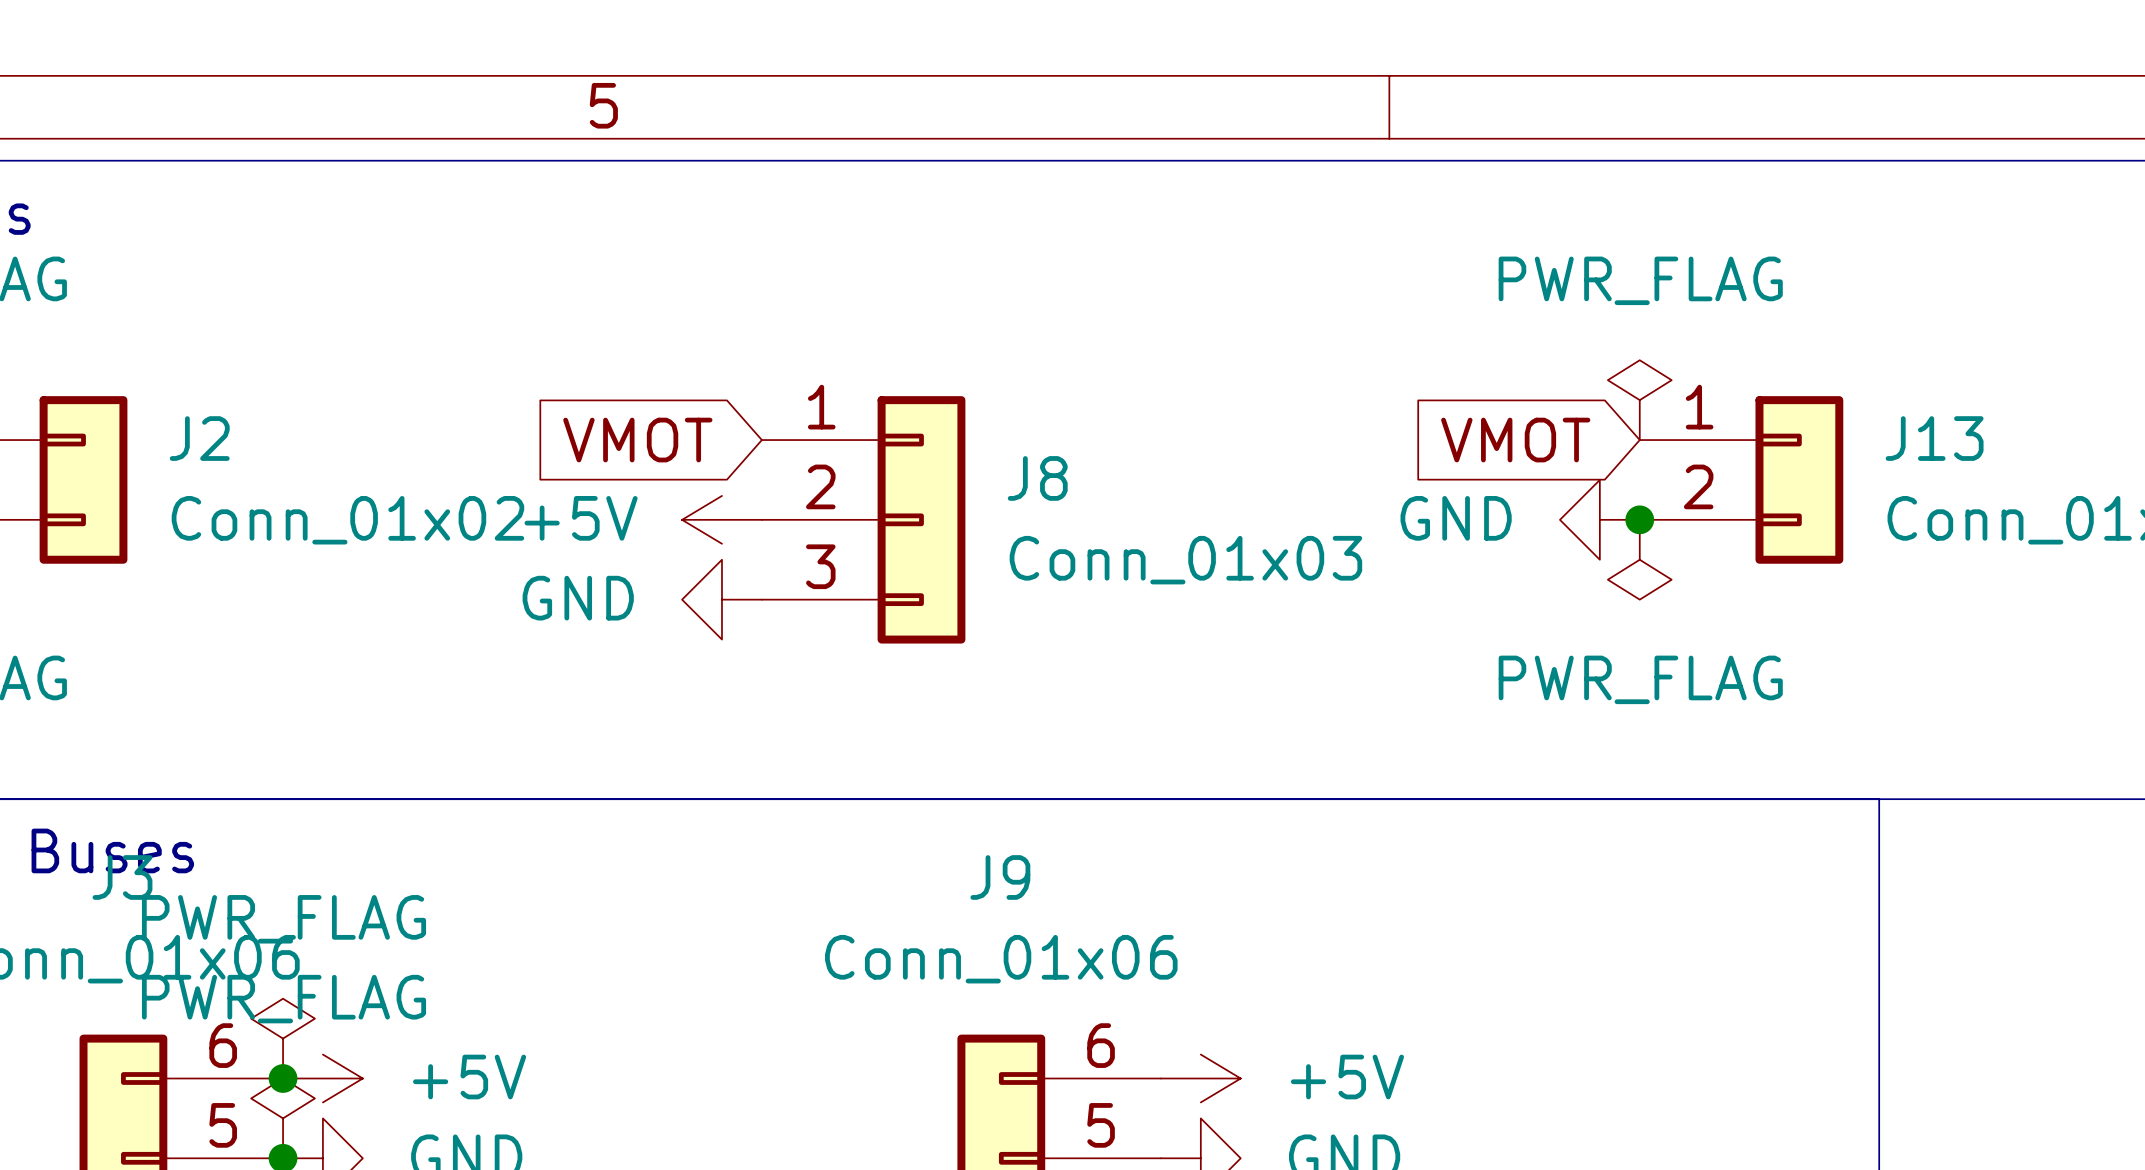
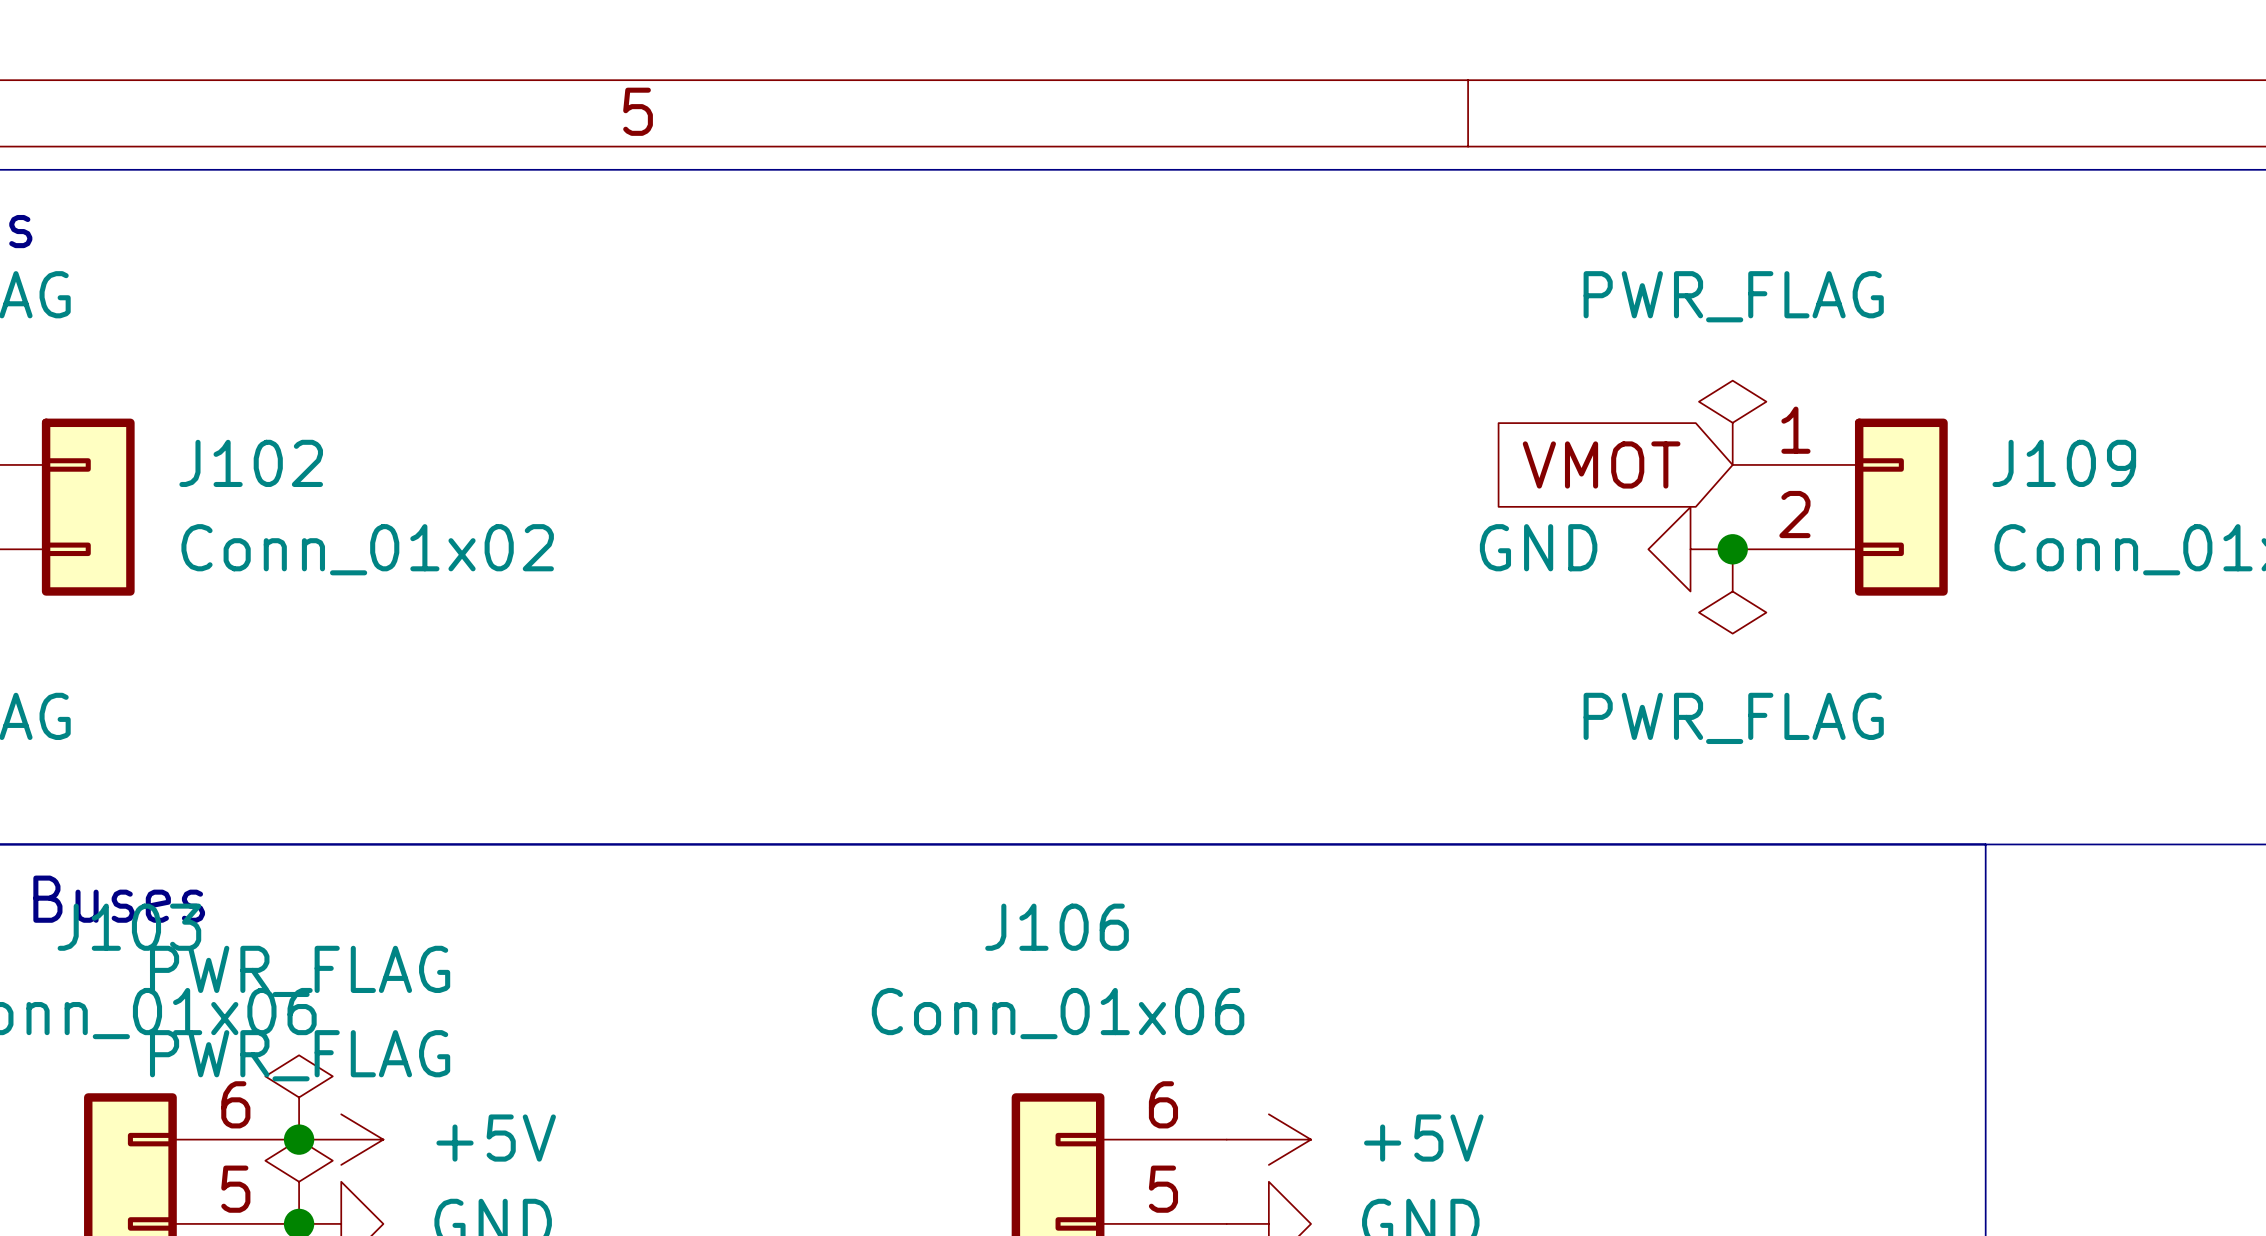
J2 name: J2 (199, 438) -> J102 (251, 463)
J13 name: J13 (1934, 438) -> J109 (2064, 463)
global label: VMOT (637, 440) -> none
power symbol: +5V (721, 519) -> none
J8: Conn_01x03 (863, 519) -> none
power symbol: GND (721, 599) -> none
J3 name: J3 (122, 877) -> J103 (129, 927)
J9 name: J9 (1000, 877) -> J106 (1057, 927)

